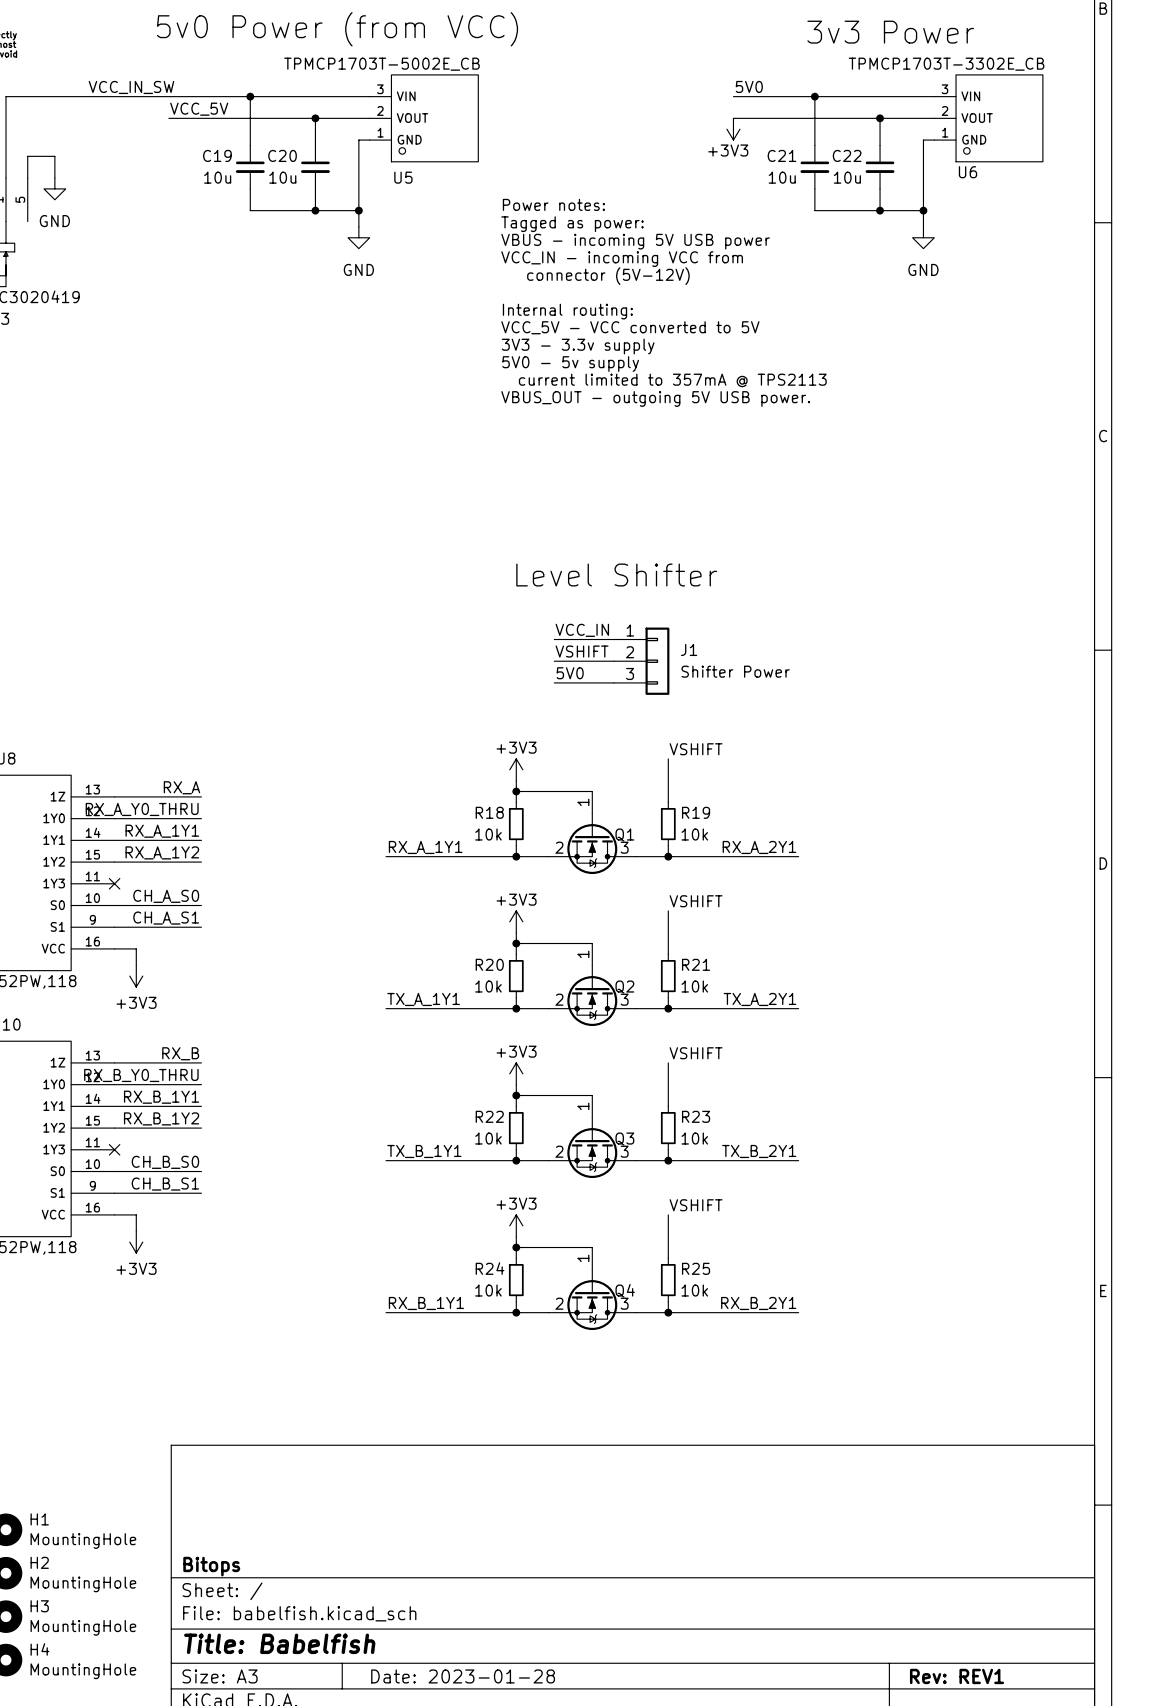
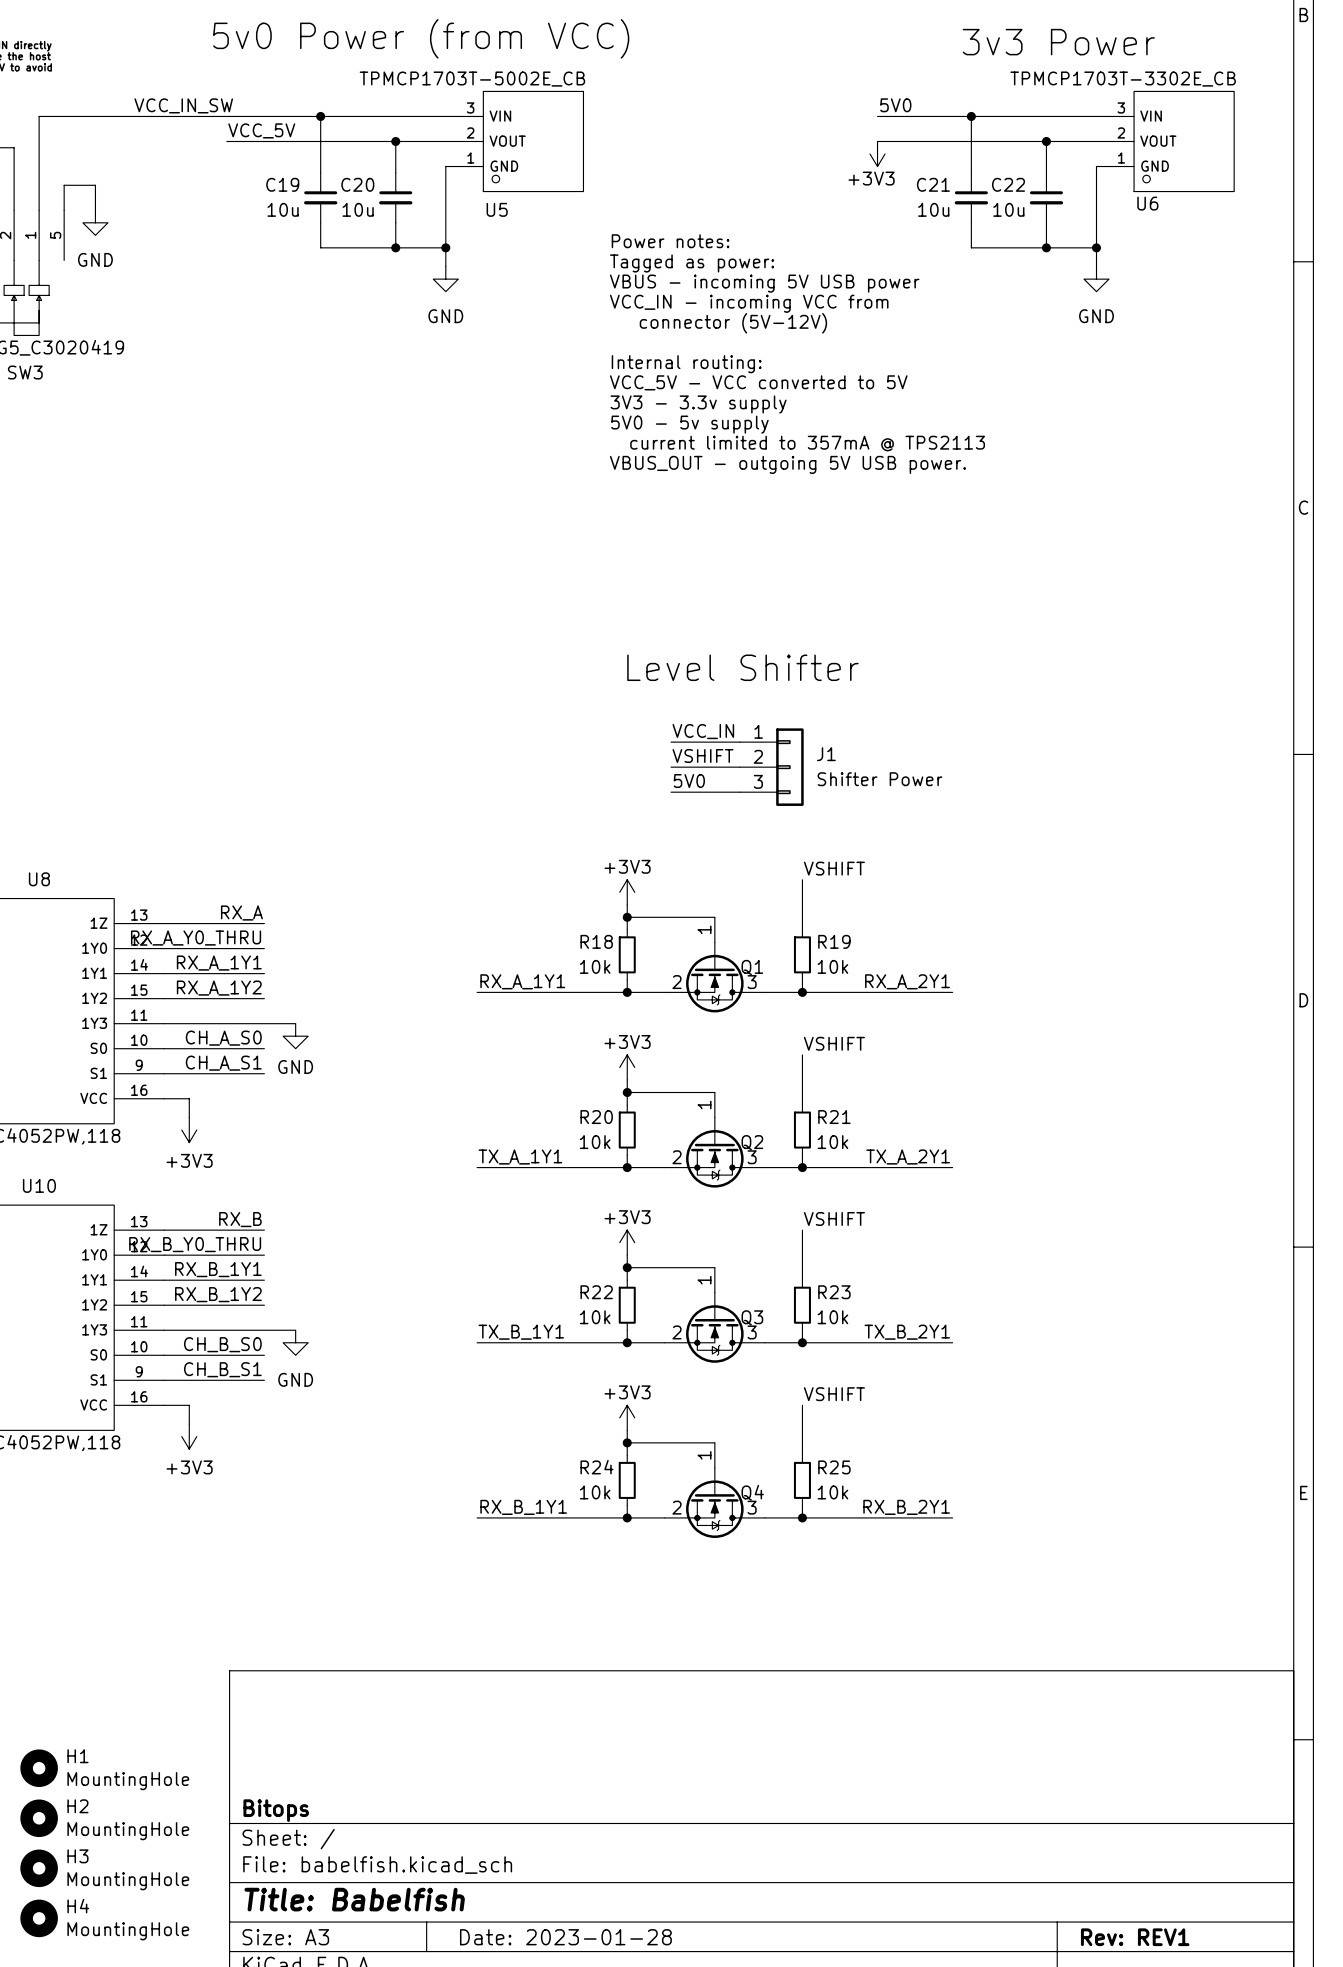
wire: none -> (164, 1023) (295, 1023)
no-connect mark: (114, 883) -> none
power symbol: none -> GND (295, 1036)
wire: none -> (164, 1330) (295, 1330)
no-connect mark: (114, 1149) -> none
power symbol: none -> GND (295, 1342)

